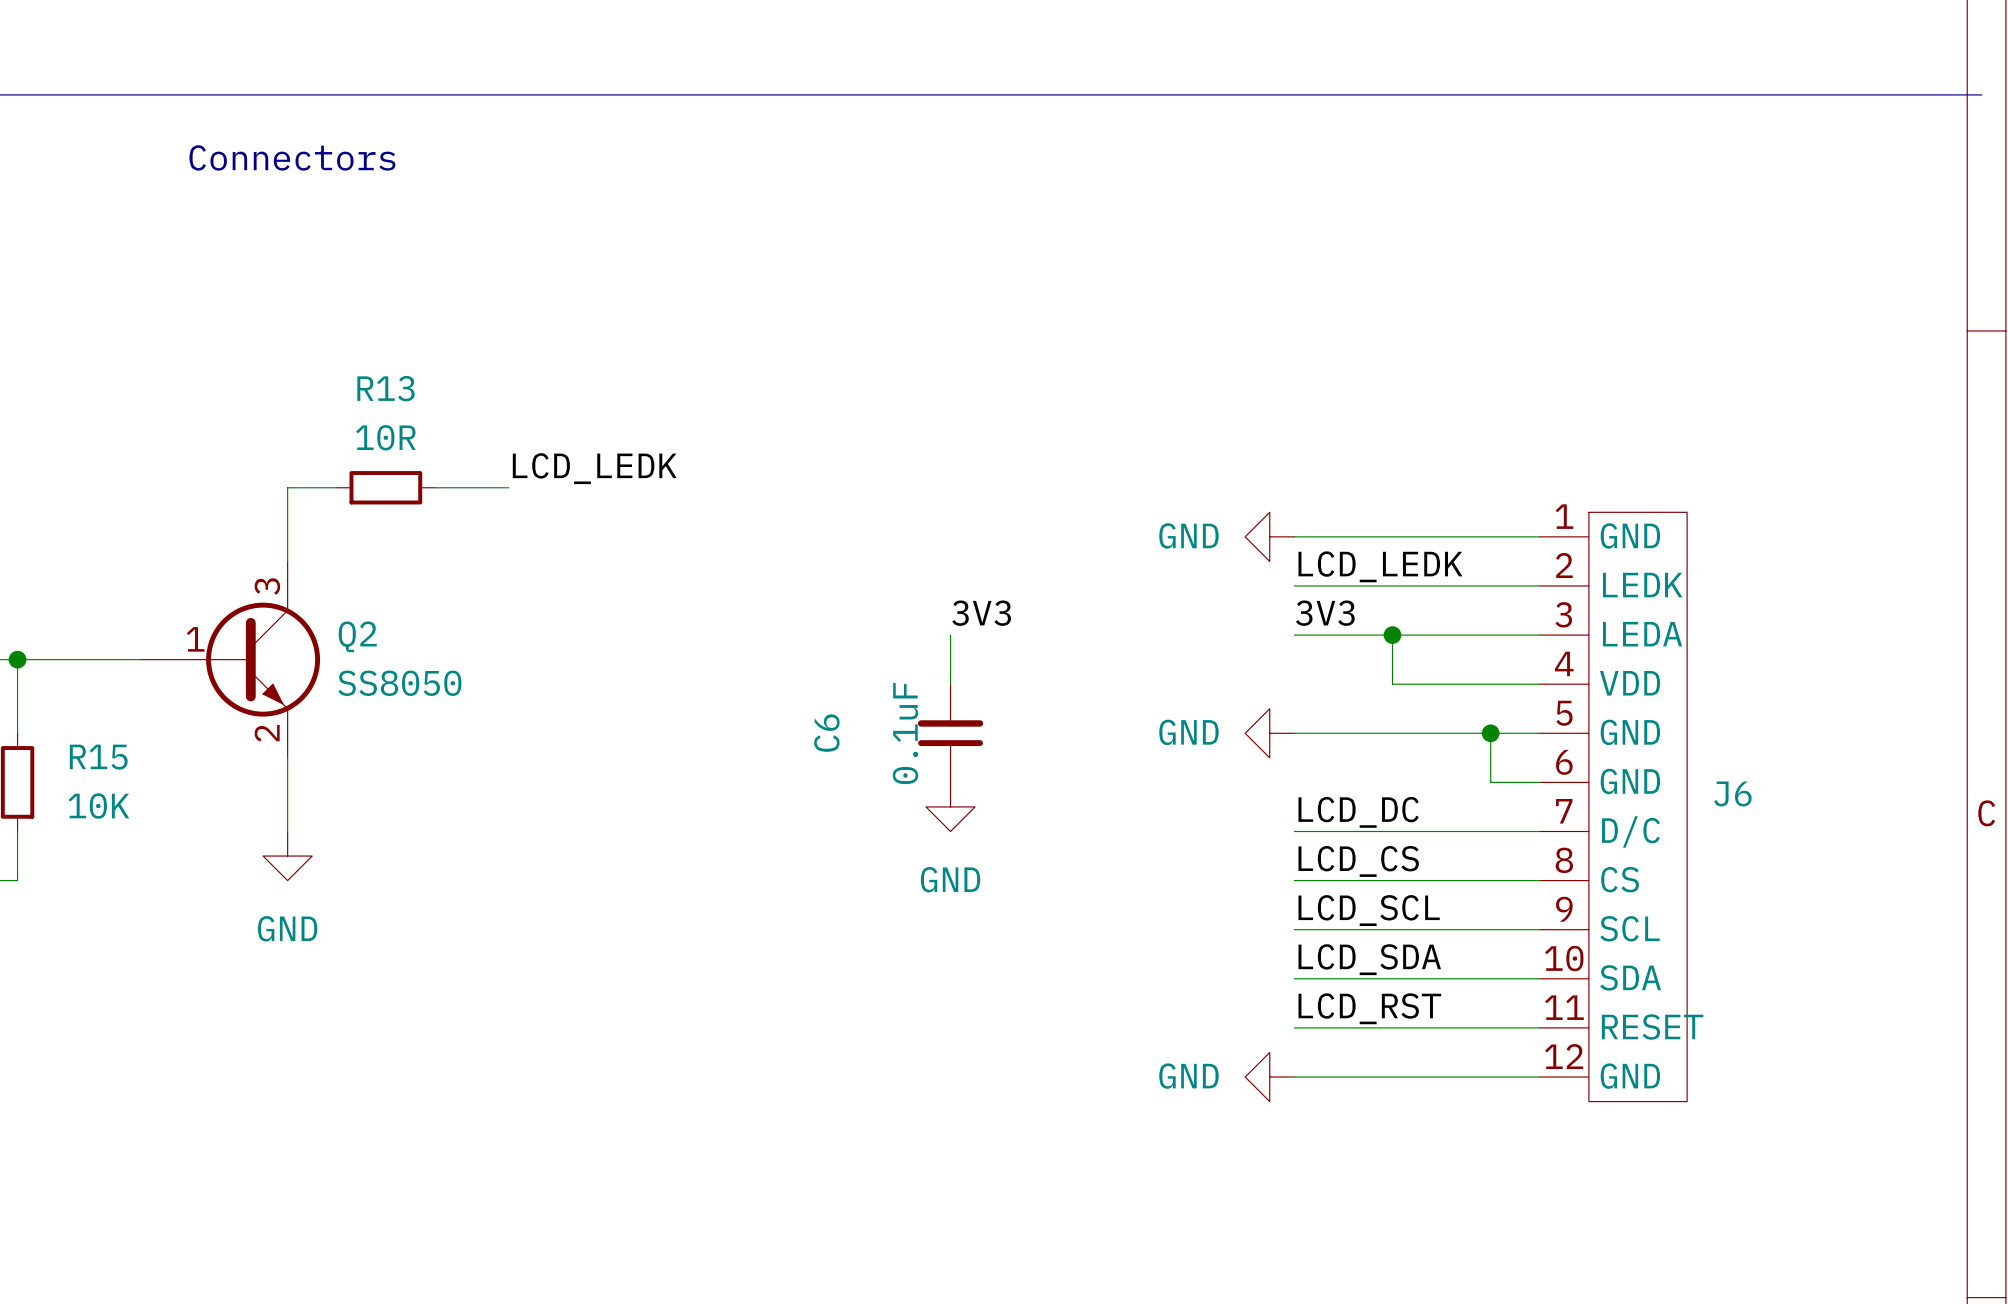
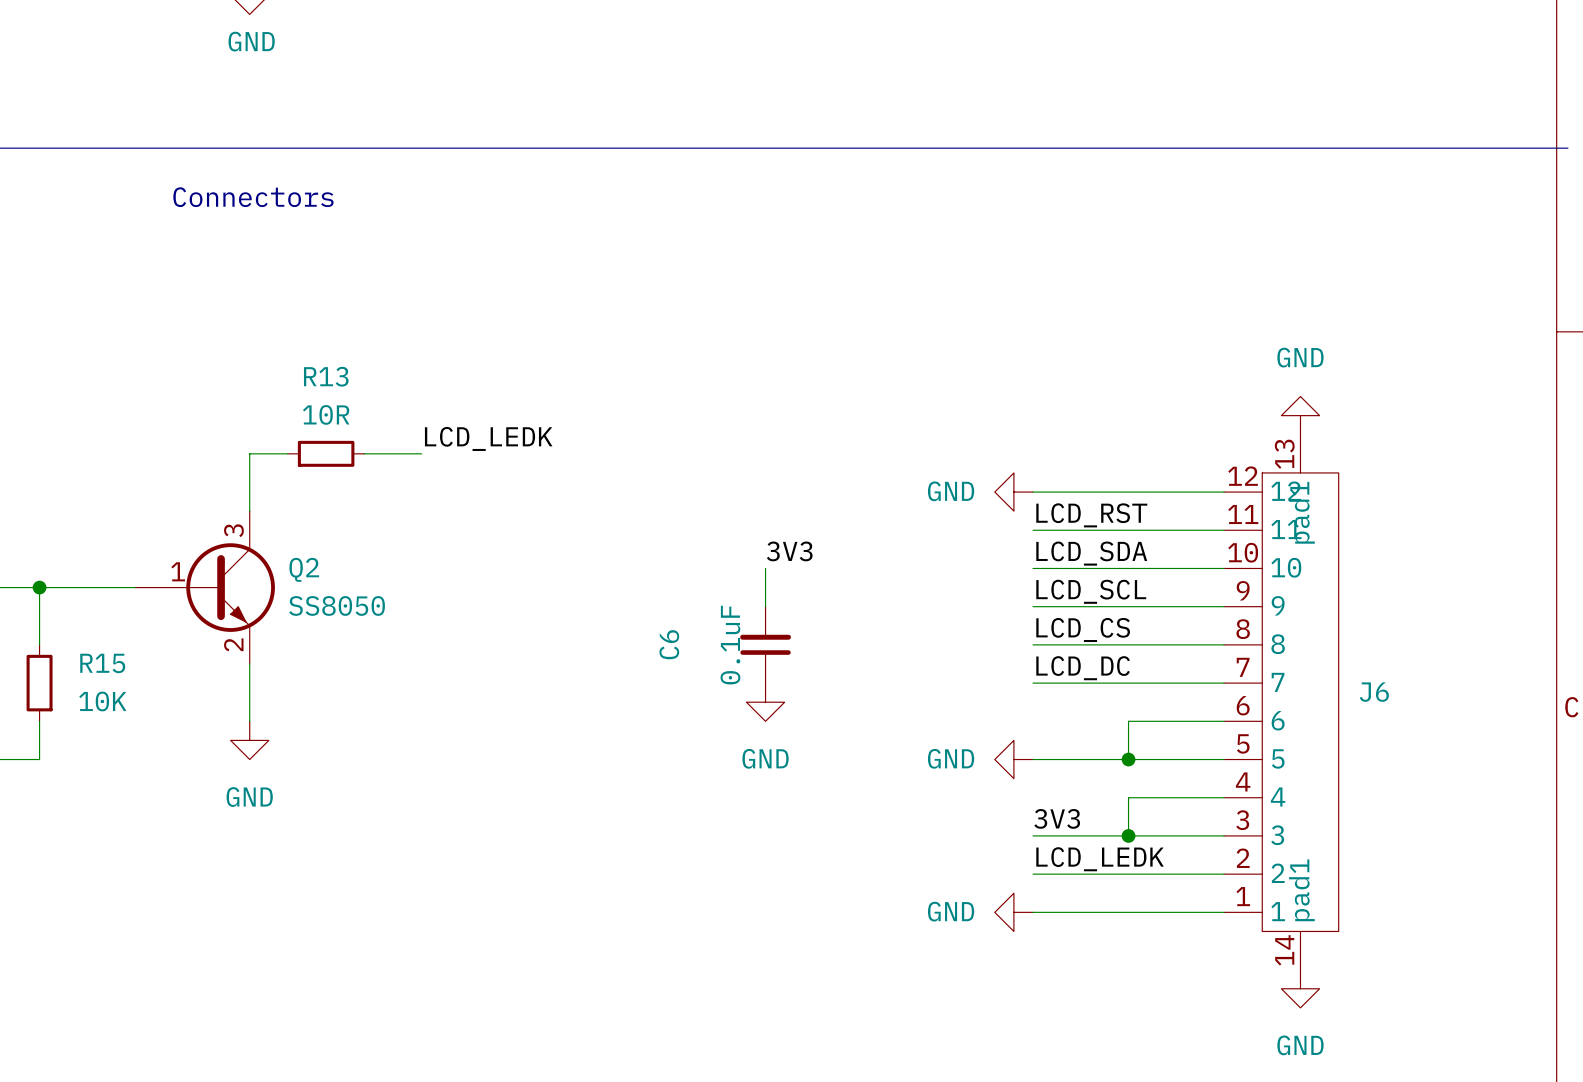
power symbol: none -> GND (1300, 415)
J6 symbol: [1539, 512, 1688, 1102] -> [1224, 434, 1339, 970]
label: LCD_LEDK (1380, 566) -> LCD_RST (1091, 515)
label: 3V3 (1325, 613) -> LCD_SDA (1091, 553)
wire: (1392, 635) (1392, 684) -> (1033, 606) (1109, 606)
junction: (1392, 635) -> none
power symbol position: GND (1269, 733) -> GND (1013, 759)
wire: (1490, 733) (1490, 782) -> (1033, 683) (1185, 683)
junction: (1490, 733) -> none
label position: LCD_DC (1358, 812) -> LCD_DC (1083, 668)
wire: (1294, 831) (1417, 831) -> (1128, 759) (1128, 721)
label position: LCD_CS (1358, 861) -> LCD_CS (1083, 629)
junction: none -> (1128, 759)
label position: LCD_SCL (1369, 910) -> LCD_SCL (1091, 591)
wire: (1294, 929) (1417, 929) -> (1128, 835) (1128, 797)
label: LCD_SDA (1369, 959) -> 3V3 (1057, 818)
junction: none -> (1128, 835)
label: LCD_RST (1369, 1008) -> LCD_LEDK (1100, 859)
power symbol: none -> GND (1300, 988)

